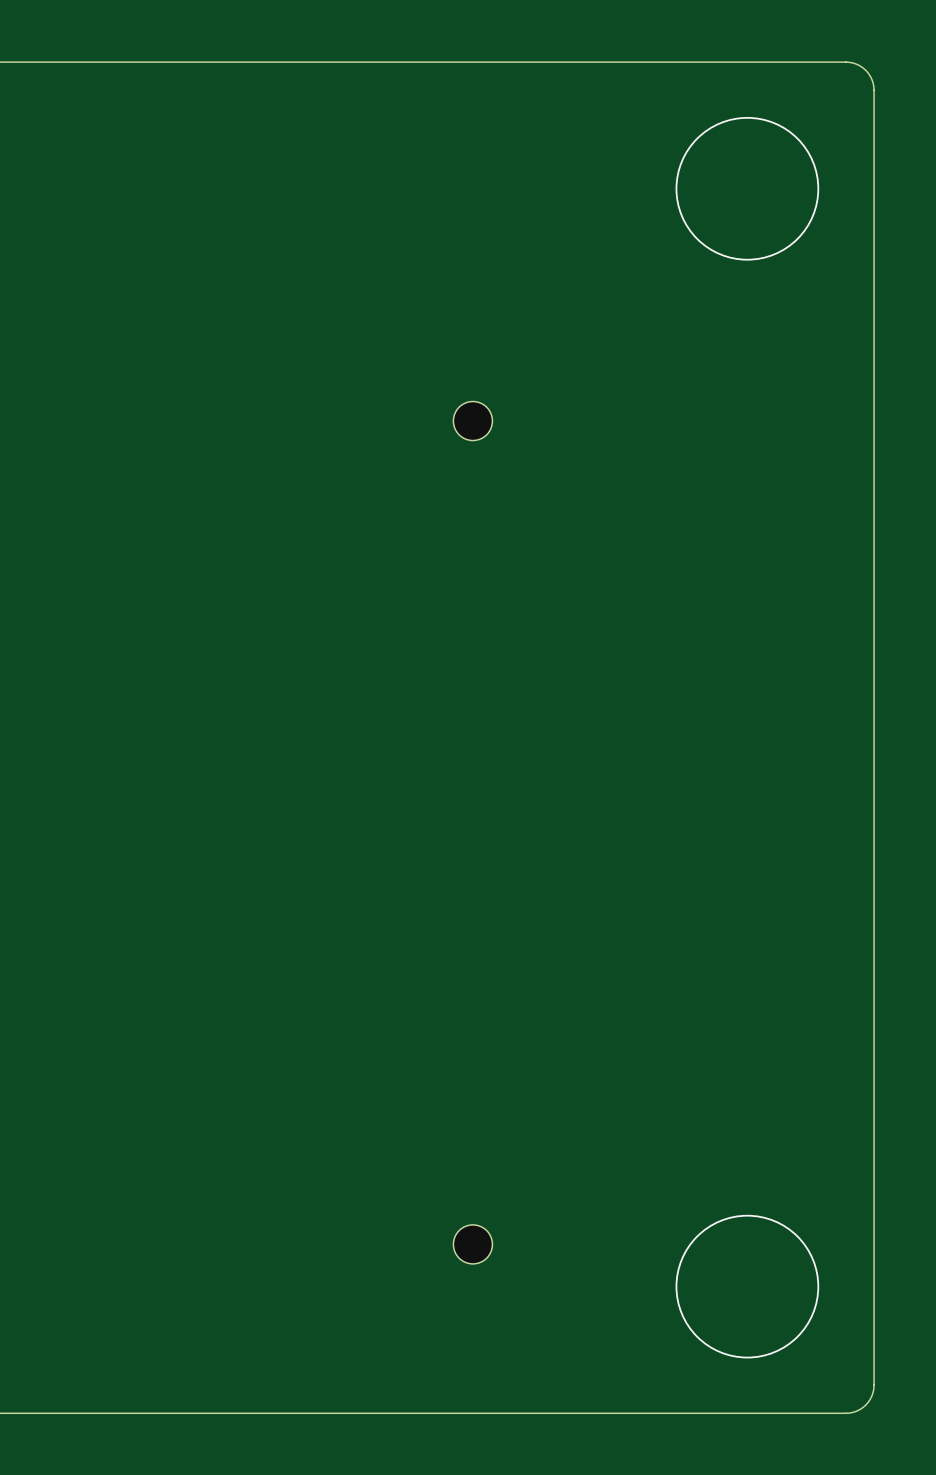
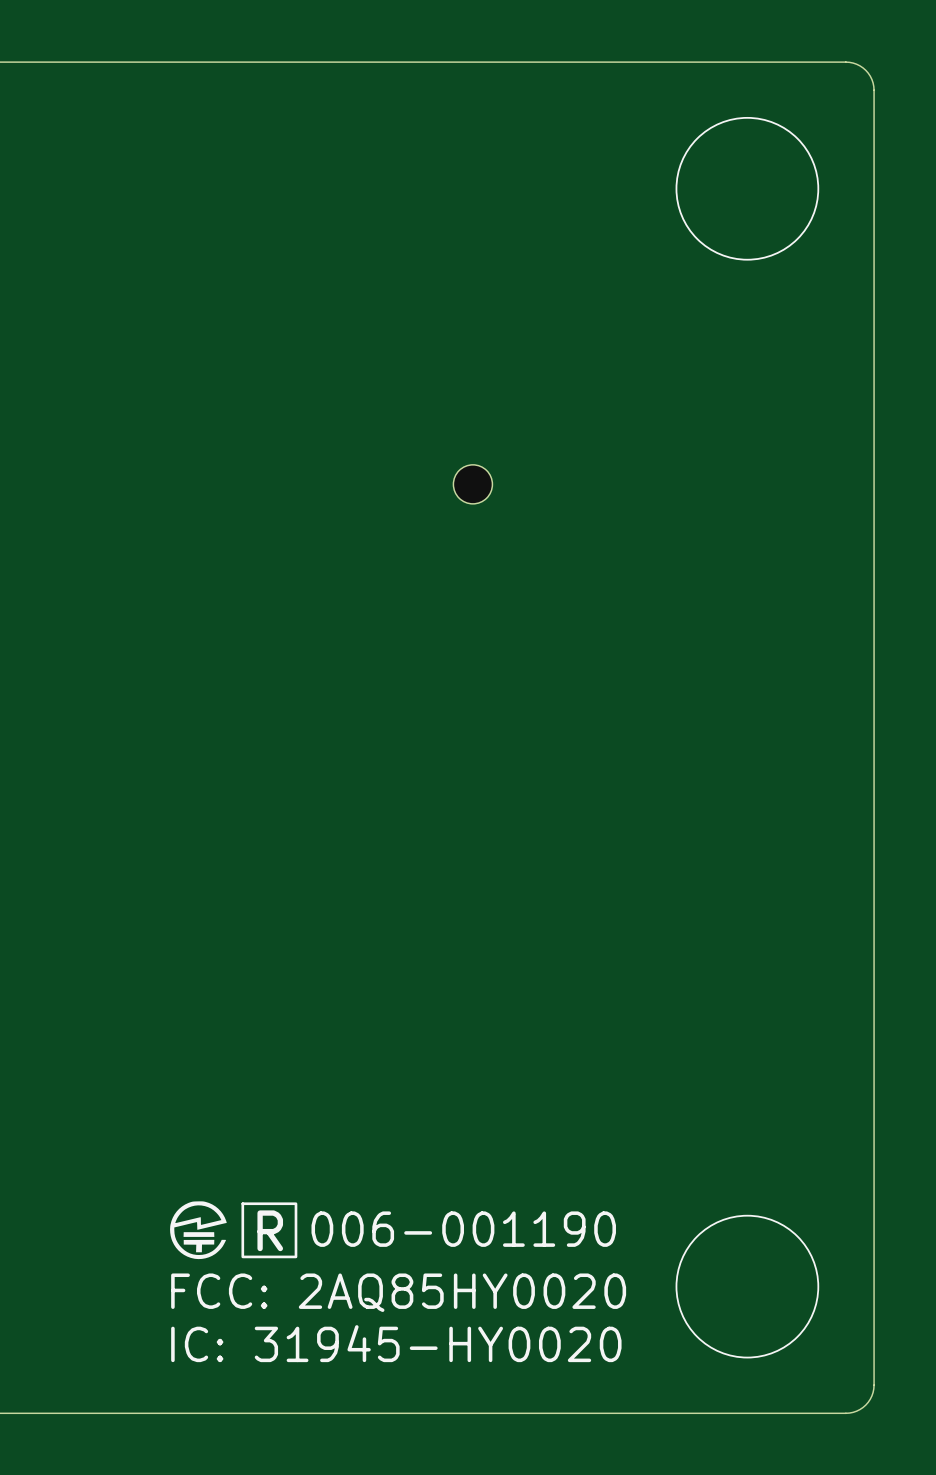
part position: (472, 421) -> (472, 484)
drawing: none -> [170, 1201, 298, 1260]
part: (472, 1244) -> none

